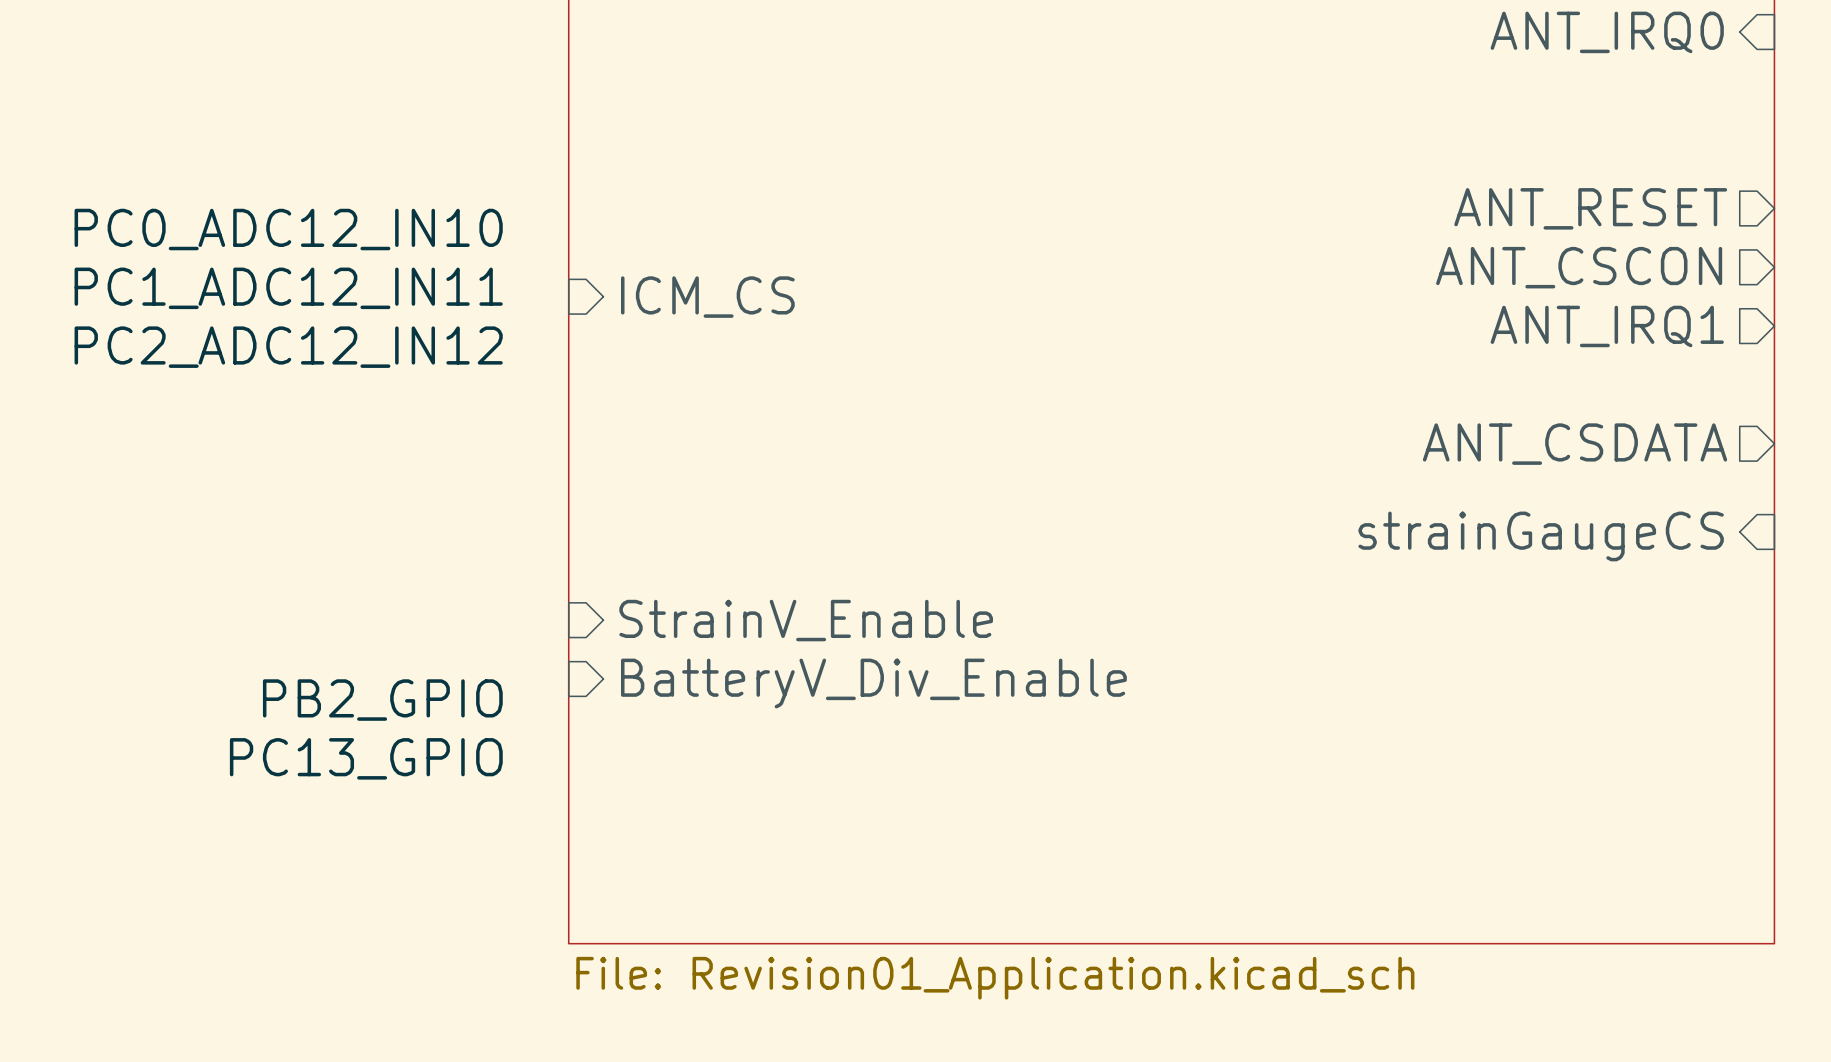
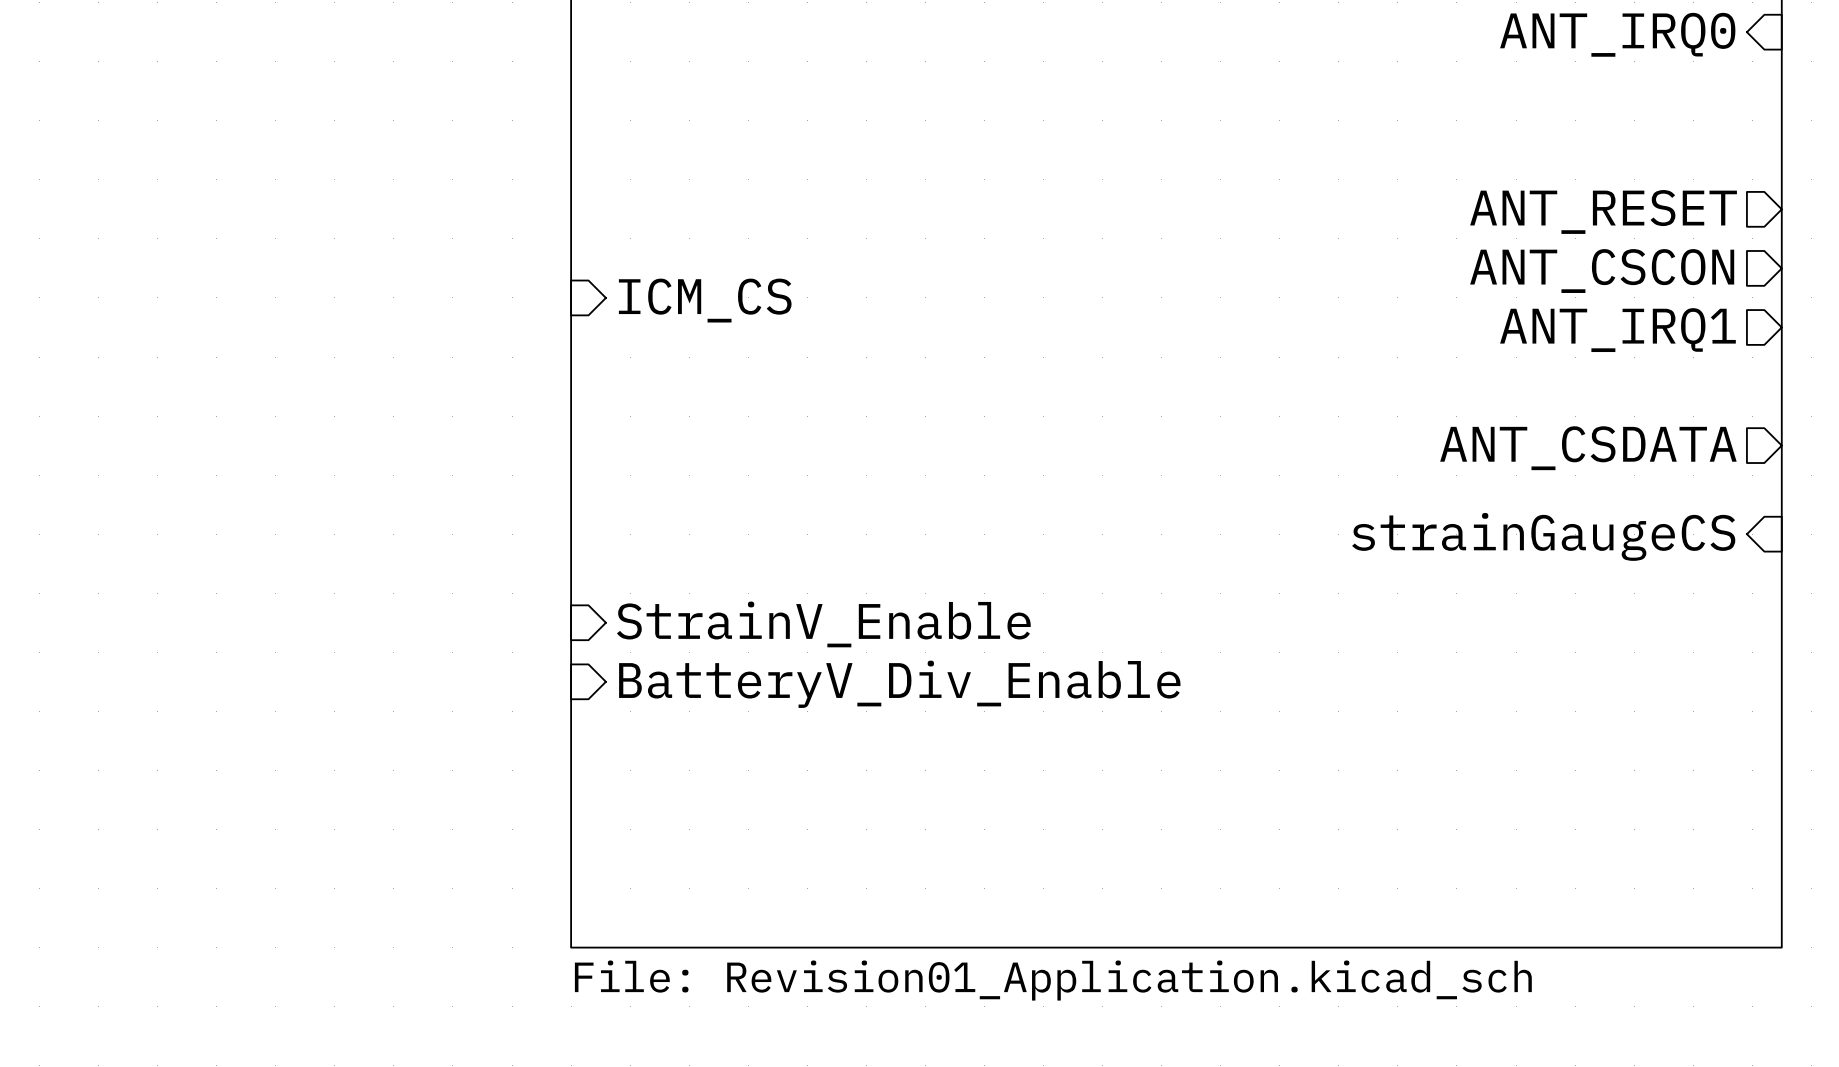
label: PC0_ADC12_IN10 (288, 229) -> none
label: PC1_ADC12_IN11 (288, 288) -> none
label: PC2_ADC12_IN12 (288, 347) -> none
label: PB2_GPIO (382, 700) -> none
label: PC13_GPIO (366, 758) -> none

